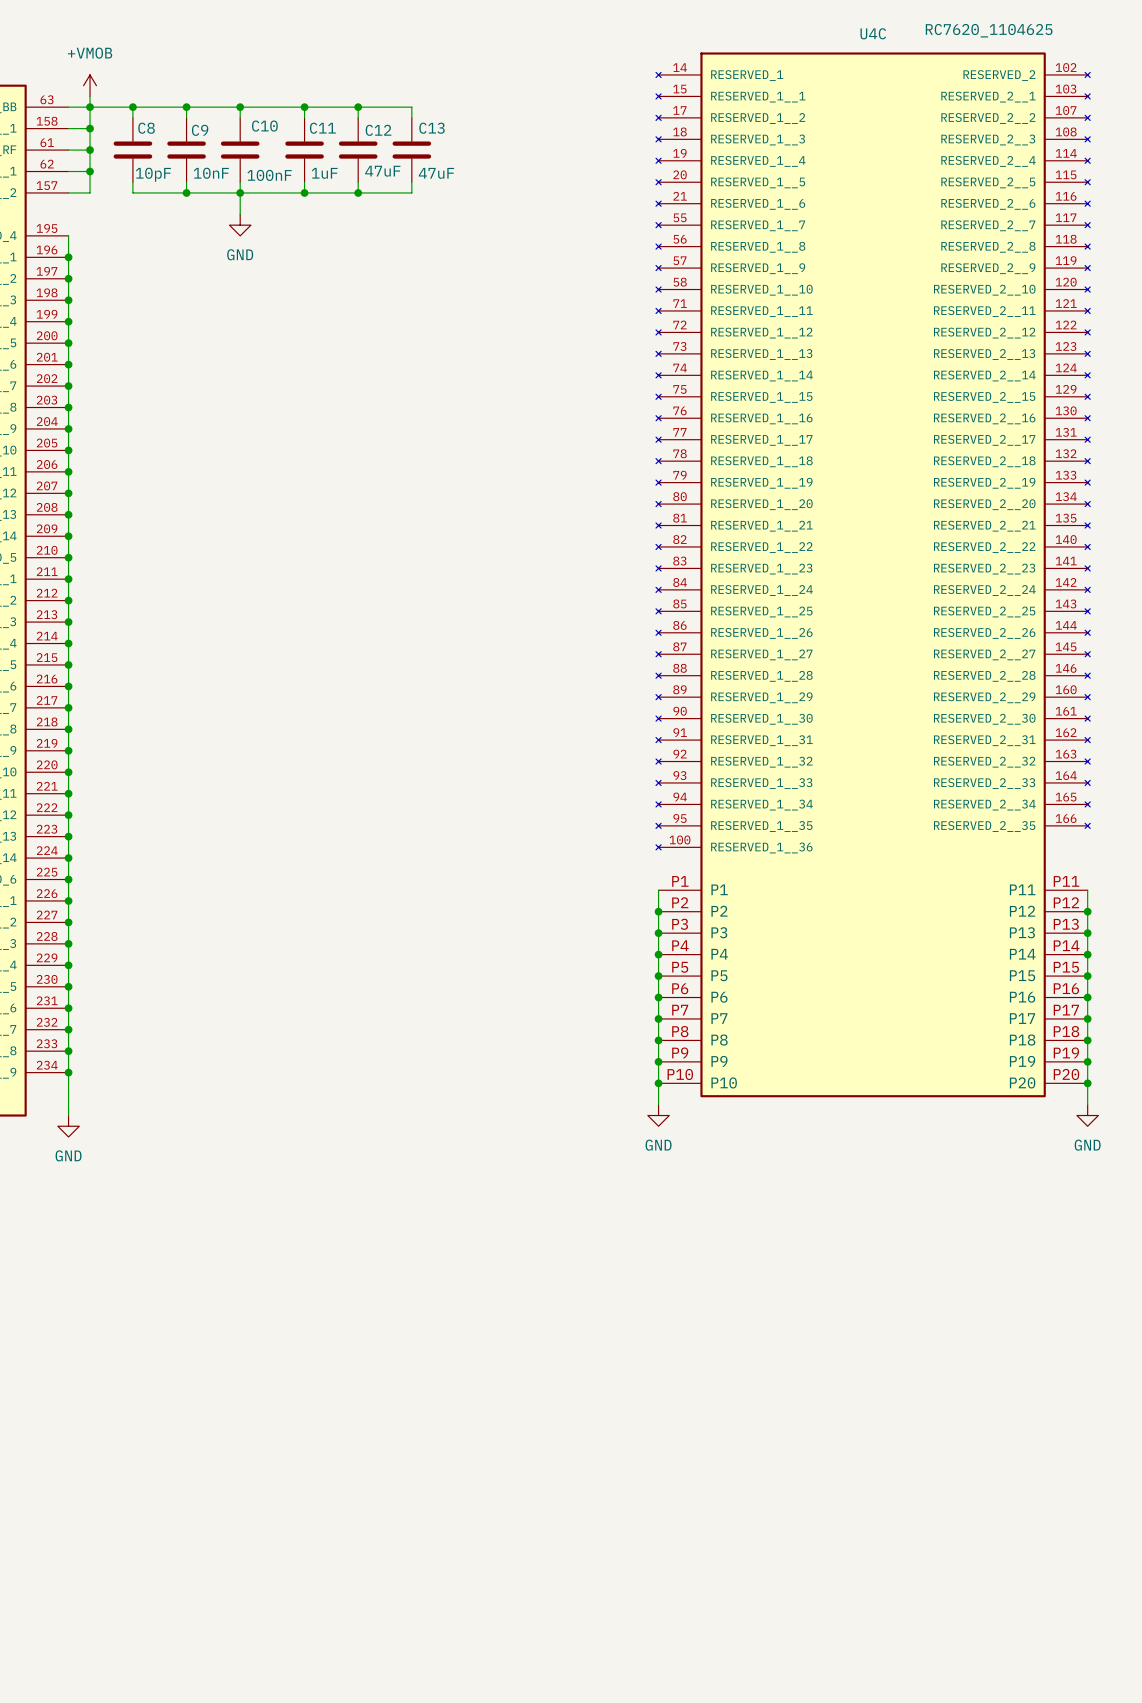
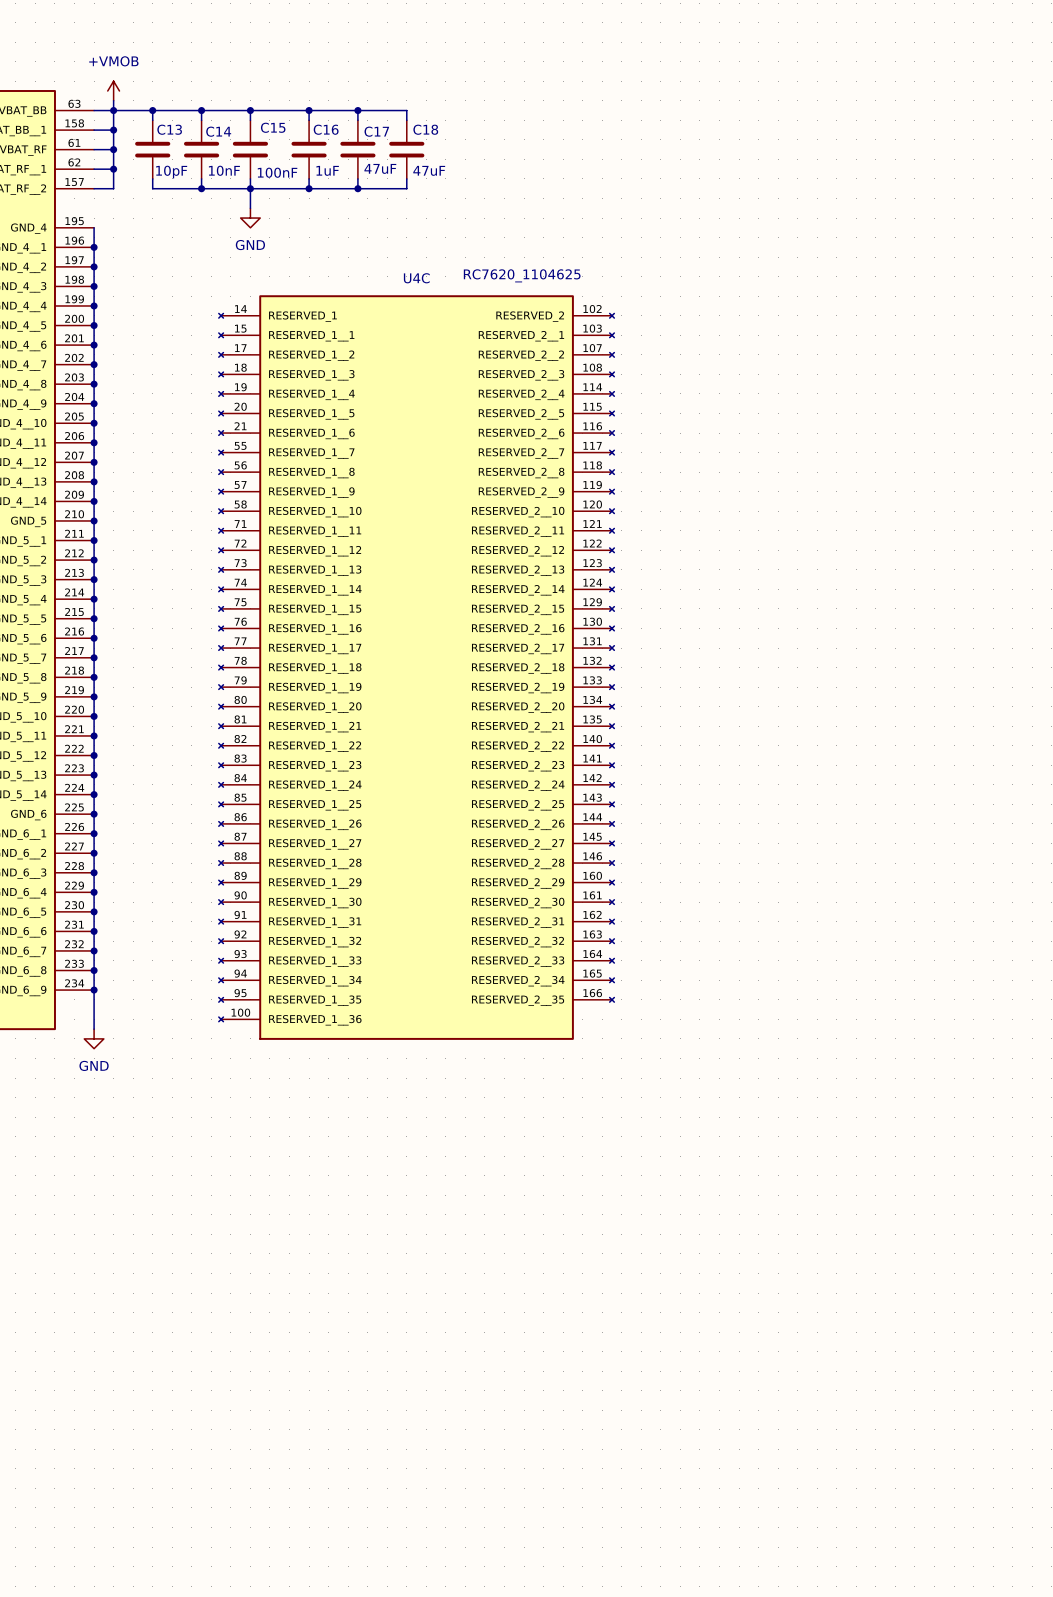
U4C value position: RC7620_1104625 (989, 30) -> RC7620_1104625 (522, 275)
U4C name position: U4C (873, 33) -> U4C (416, 278)
U4C symbol: [656, 52, 1091, 1098] -> [218, 295, 615, 1040]
C10 name: C10 (264, 126) -> C15 (273, 127)
C8 name: C8 (146, 128) -> C13 (169, 129)
C11 name: C11 (322, 128) -> C16 (326, 129)
C13 name: C13 (432, 128) -> C18 (425, 129)
C9 name: C9 (200, 130) -> C14 (218, 131)
C12 name: C12 (378, 130) -> C17 (376, 131)
wire: (658, 890) (658, 1104) -> none
wire: (1087, 890) (1087, 1104) -> none
junction: (658, 911) -> none
junction: (1087, 911) -> none
junction: (658, 933) -> none
junction: (1087, 933) -> none
junction: (658, 954) -> none
junction: (1087, 954) -> none
junction: (658, 976) -> none
junction: (1087, 976) -> none
junction: (658, 997) -> none
junction: (1087, 997) -> none
junction: (658, 1018) -> none
junction: (1087, 1018) -> none
junction: (658, 1040) -> none
junction: (1087, 1040) -> none
junction: (658, 1061) -> none
junction: (1087, 1061) -> none
junction: (658, 1083) -> none
junction: (1087, 1083) -> none
power symbol: GND (658, 1115) -> none
power symbol: GND (1087, 1115) -> none

